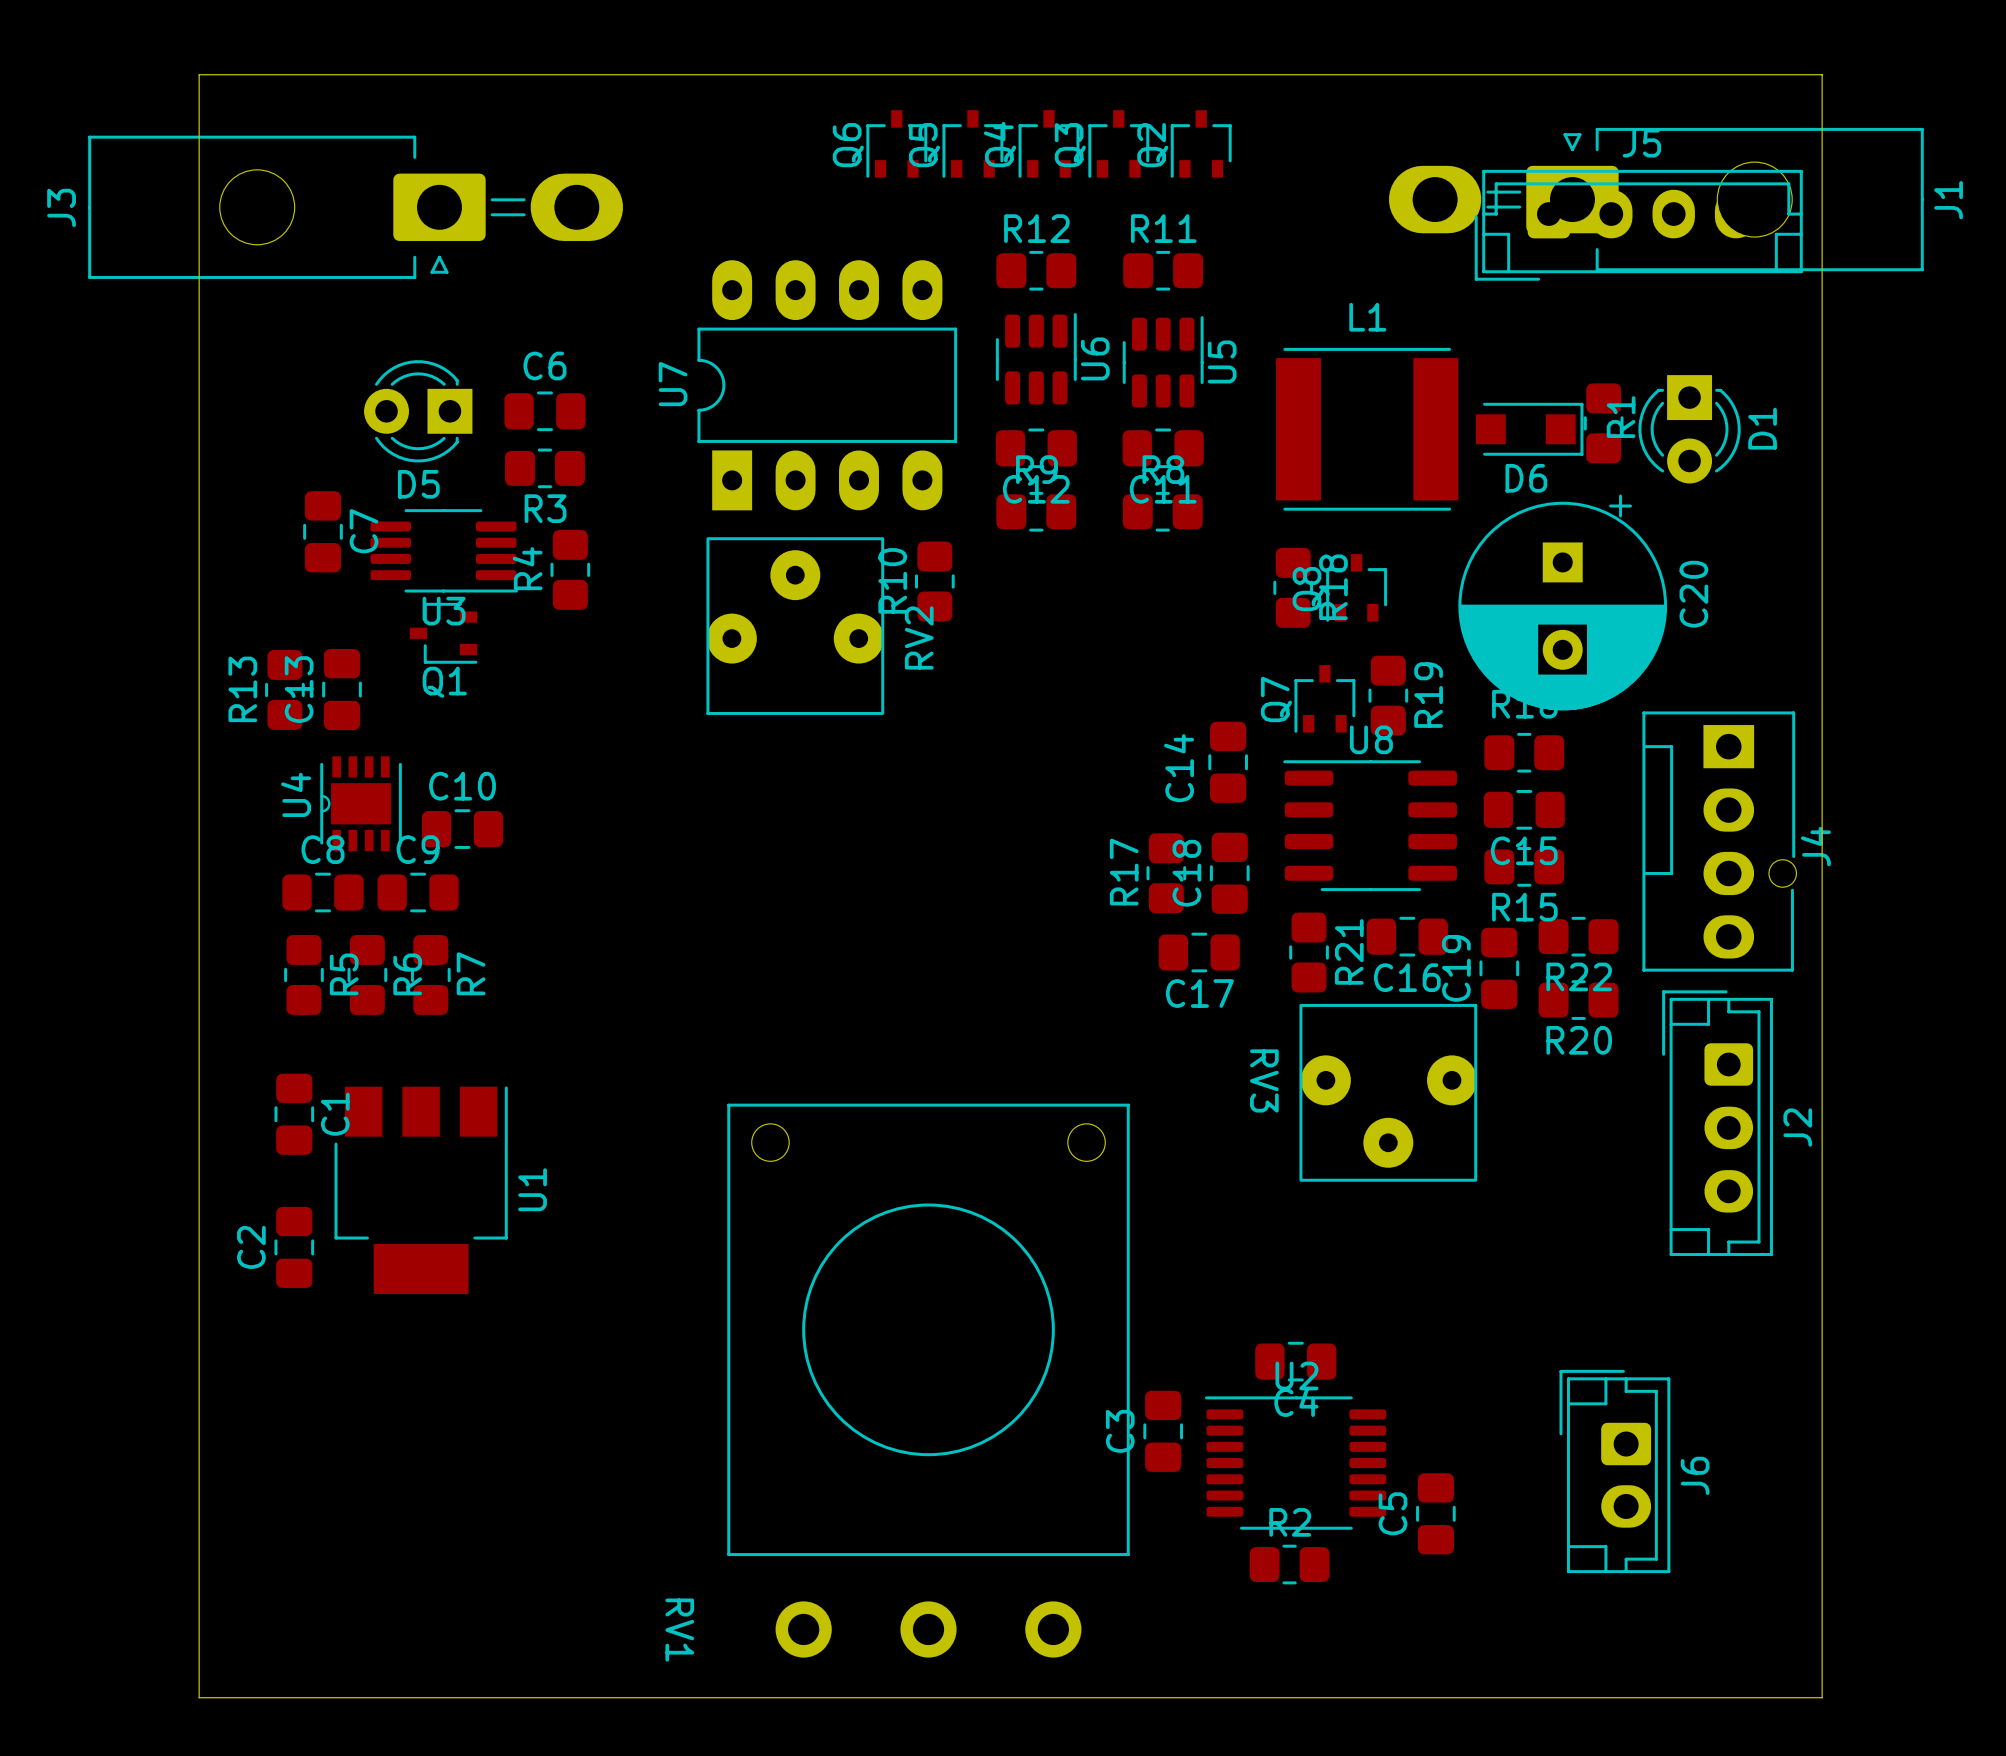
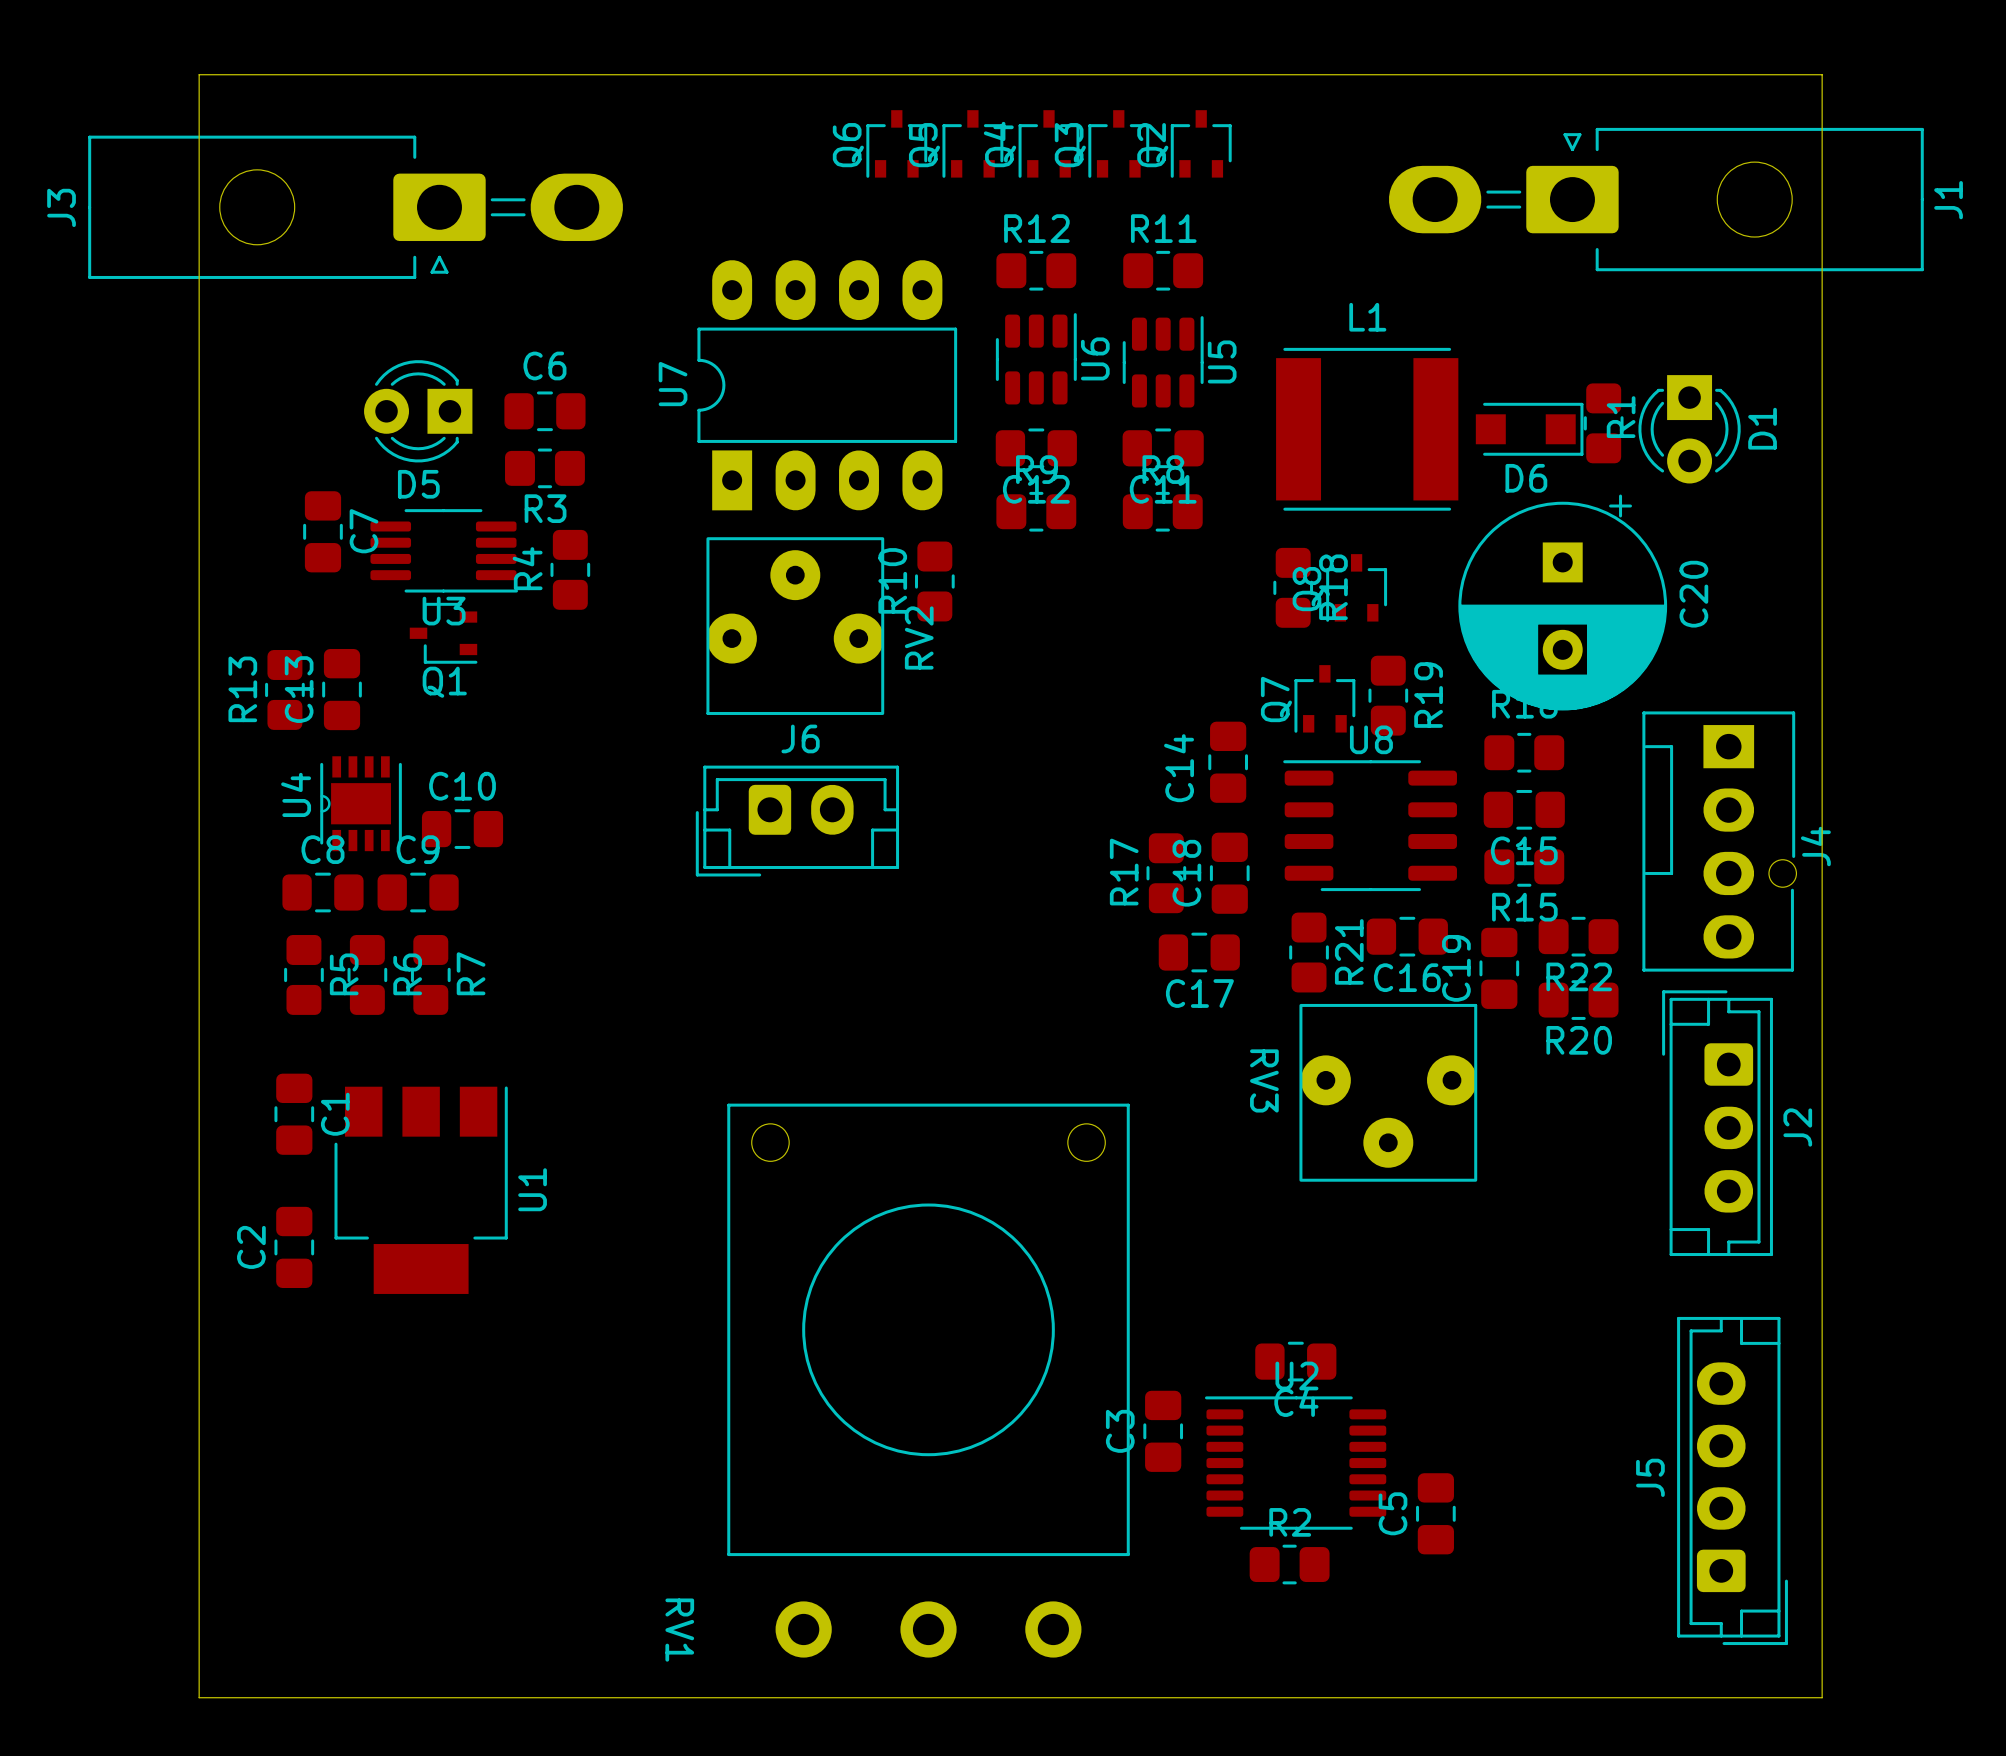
J5 rotation: 0° (1638, 225) -> 90° counterclockwise (1732, 1480)
J5 position: (1638, 225) -> (1732, 1480)
J6 rotation: 0° (1614, 1471) -> 90° counterclockwise (797, 821)
J6 position: (1614, 1471) -> (797, 821)

